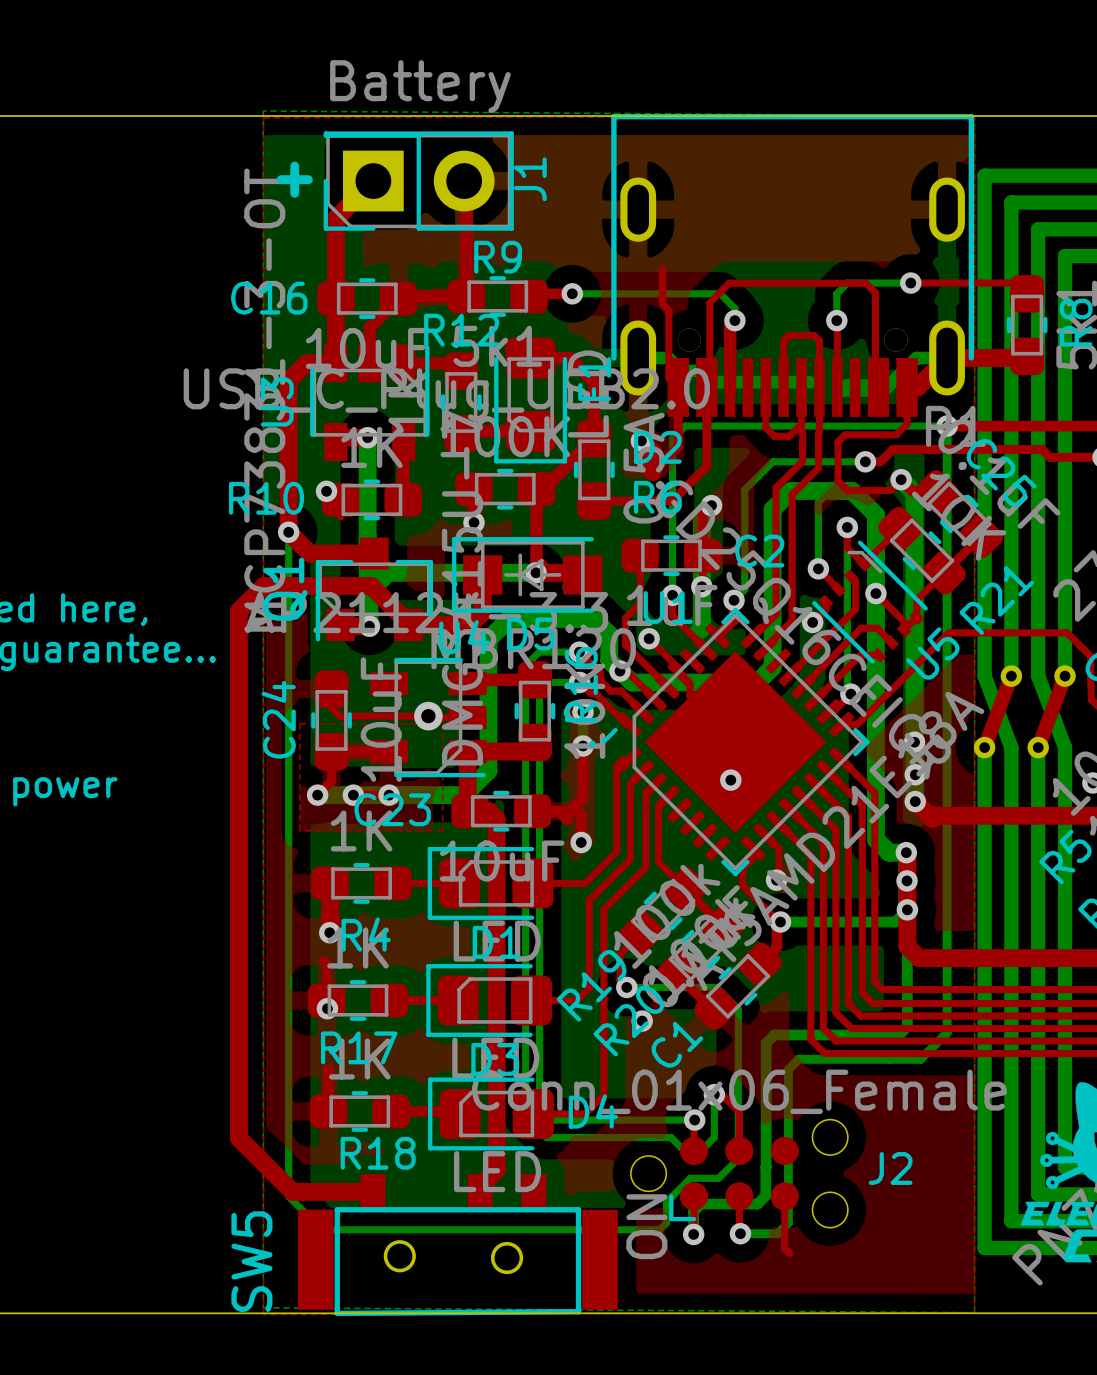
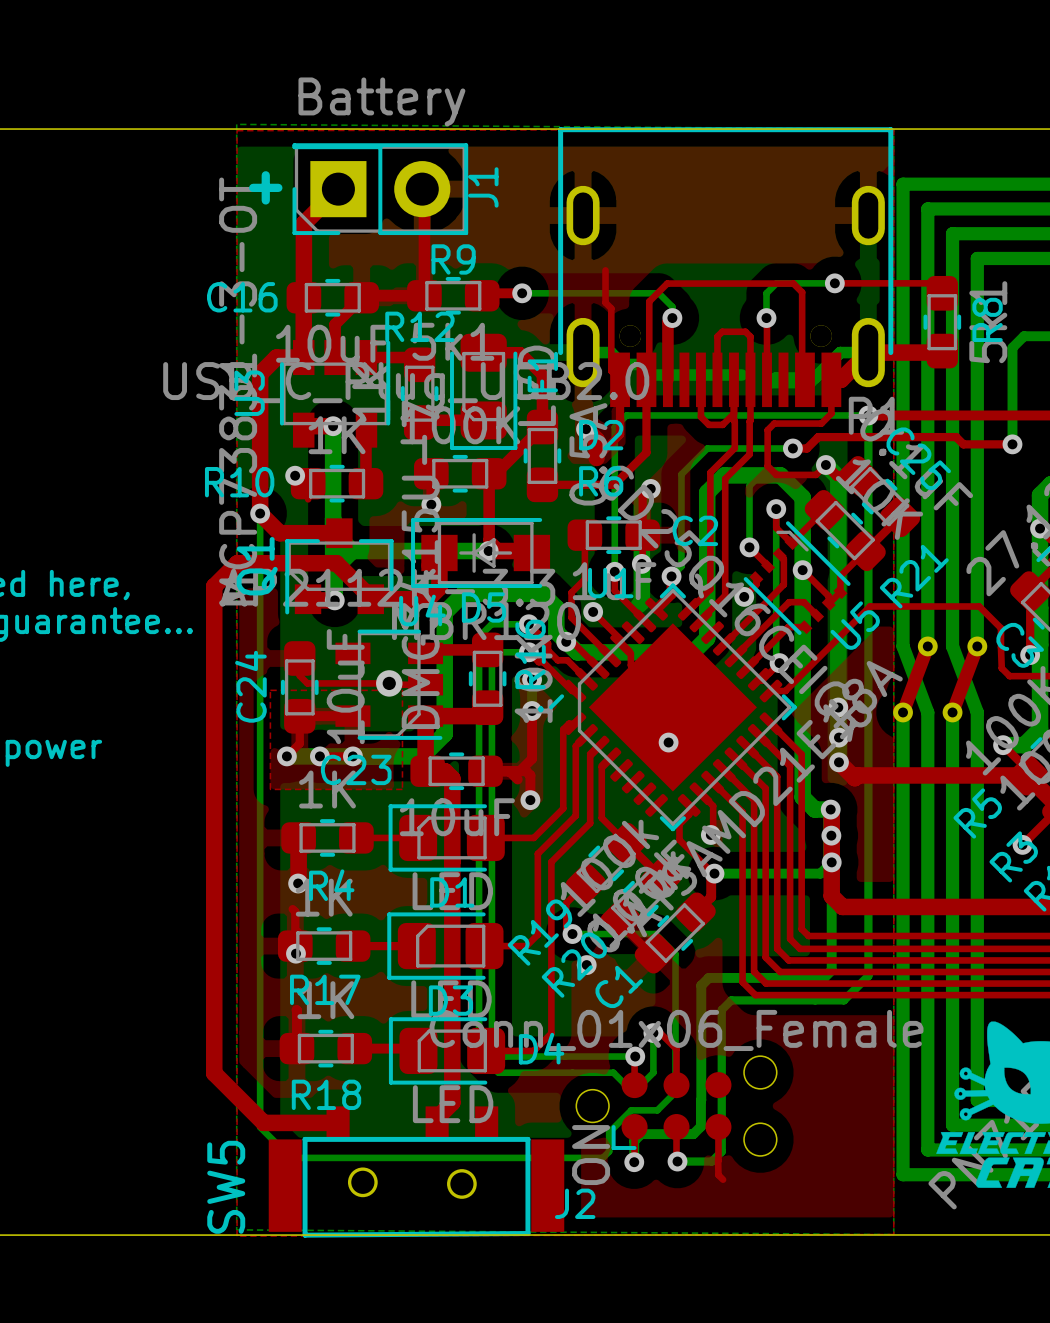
R18 name position: R18 (378, 1153) -> R18 (326, 1094)
J2 name position: J2 (890, 1168) -> J2 (575, 1203)

